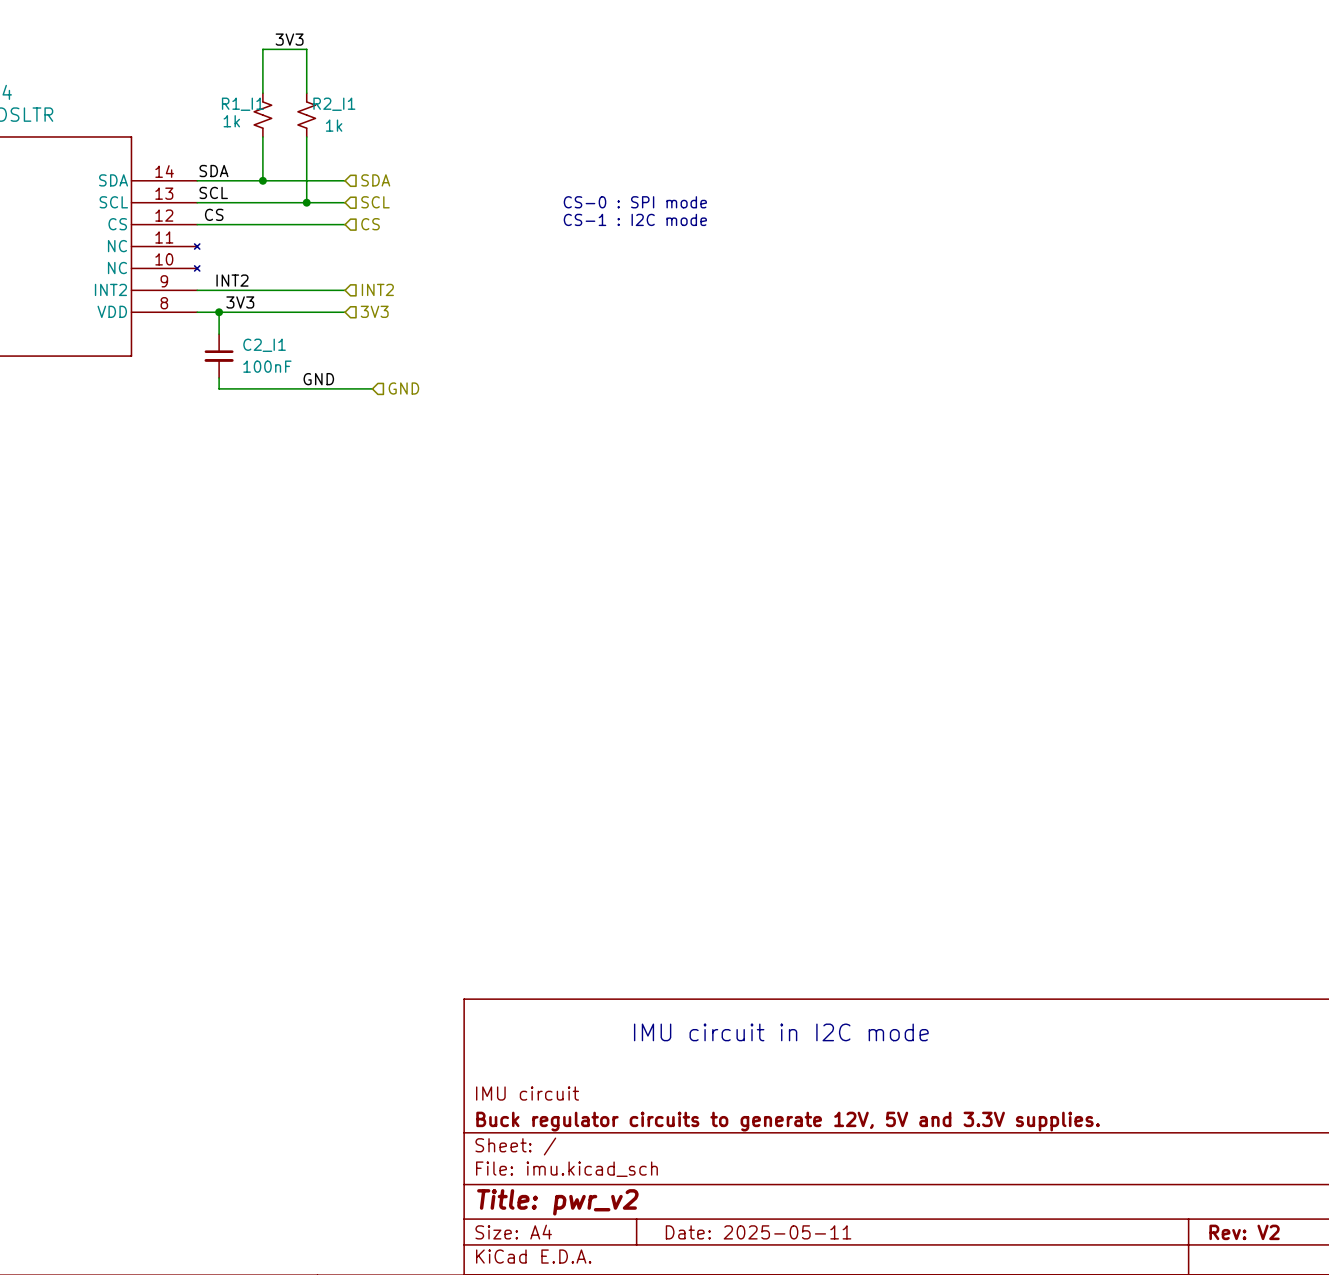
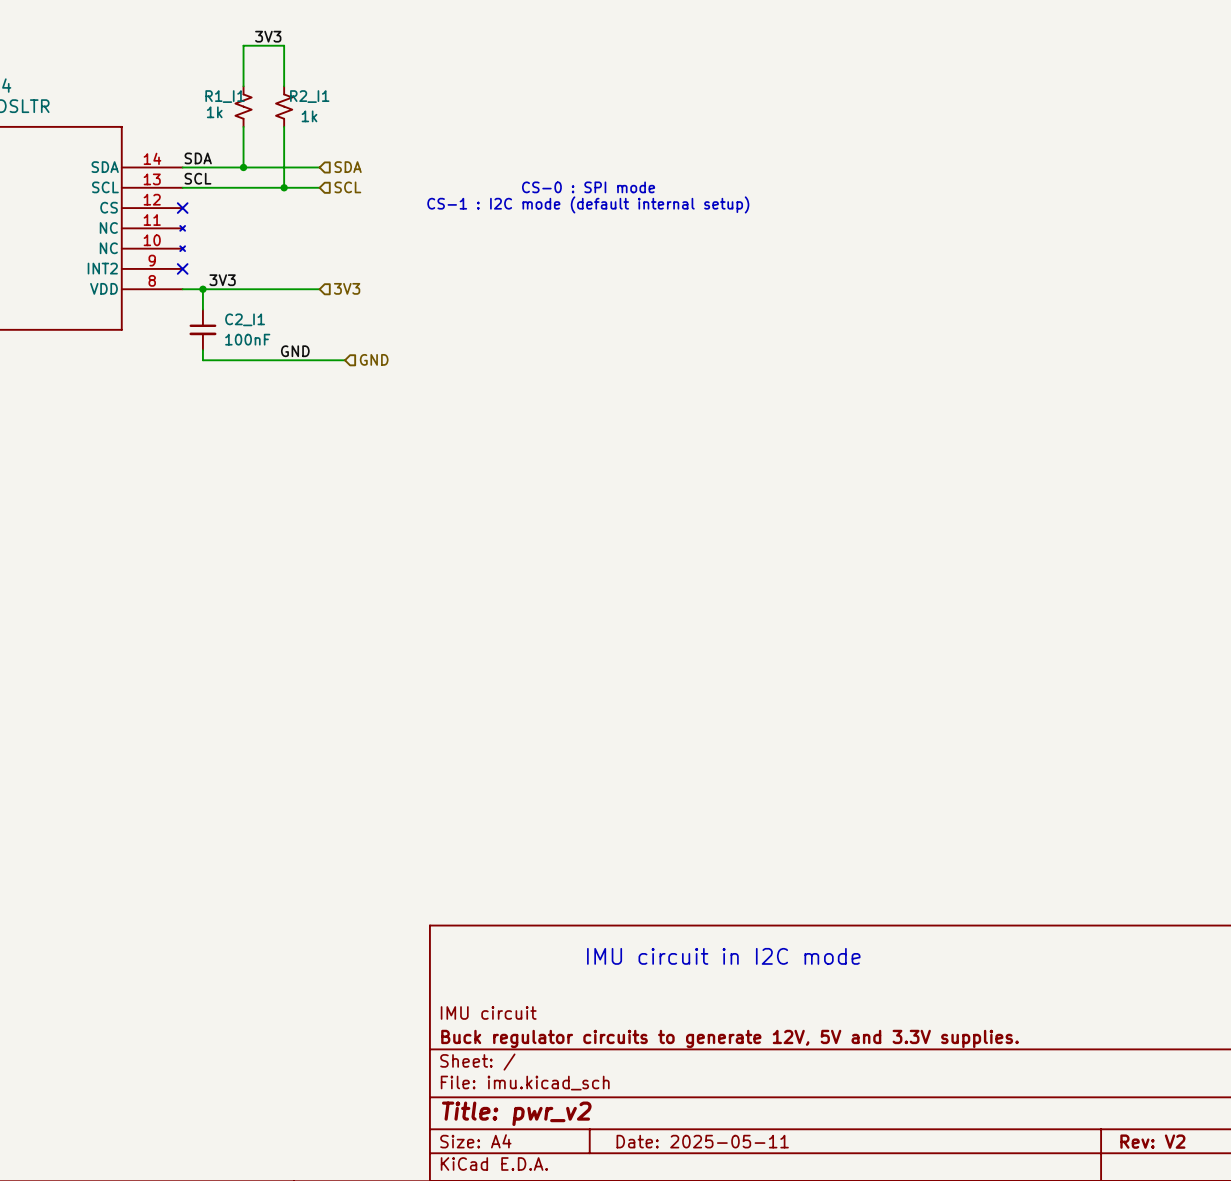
label: CS (214, 214) -> none
text: CS-1 : I2C mode (635, 219) -> CS-1 : I2C mode (default internal setup) (588, 204)
wire: (197, 224) (345, 224) -> none
no-connect mark: none -> (182, 208)
hierarchical label: CS (370, 224) -> none
label: INT2 (232, 280) -> none
hierarchical label: INT2 (377, 289) -> none
wire: (197, 290) (345, 290) -> none
no-connect mark: none -> (182, 268)

